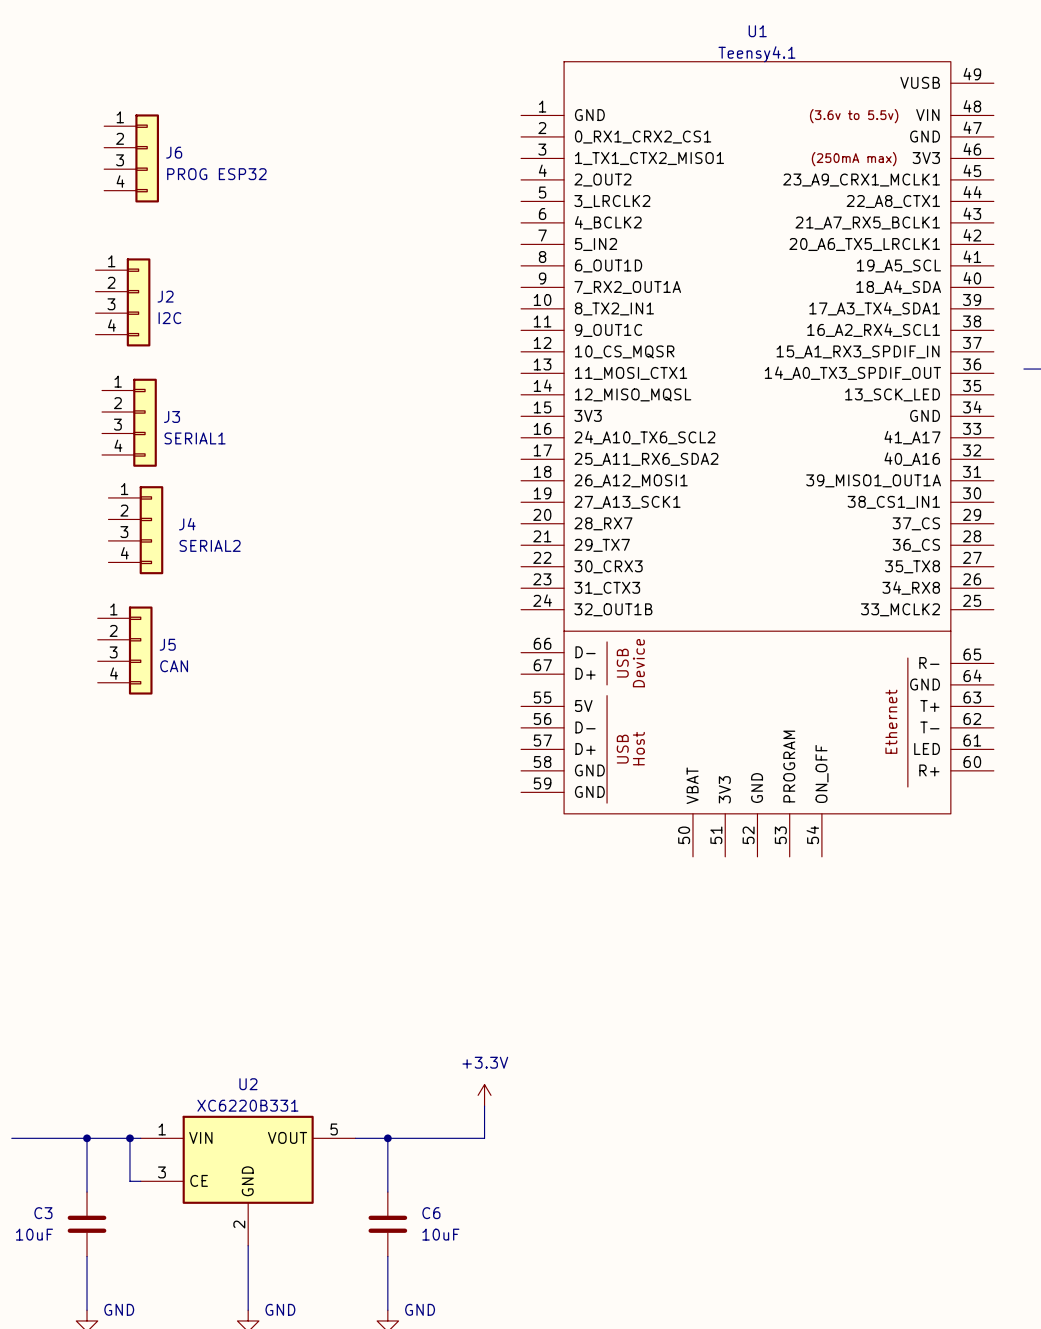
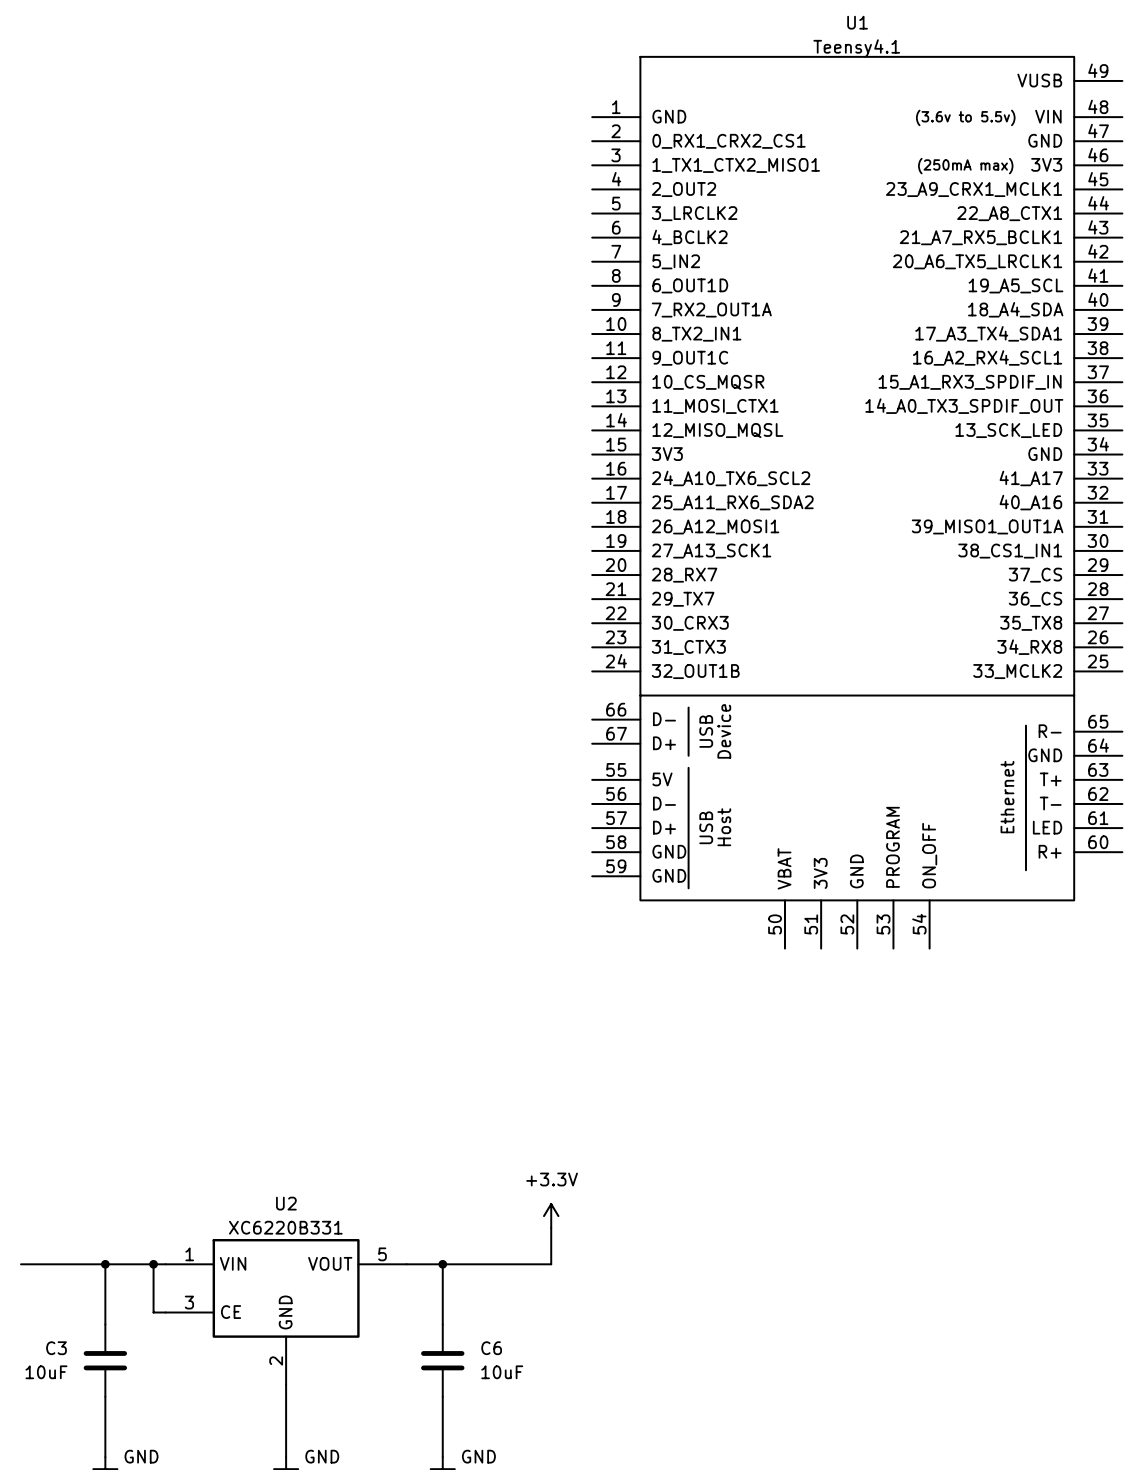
J6: PROG ESP32 (131, 158) -> none
J2: I2C (123, 302) -> none
J3: SERIAL1 (129, 422) -> none
J4: SERIAL2 (135, 530) -> none
J5: CAN (125, 650) -> none

